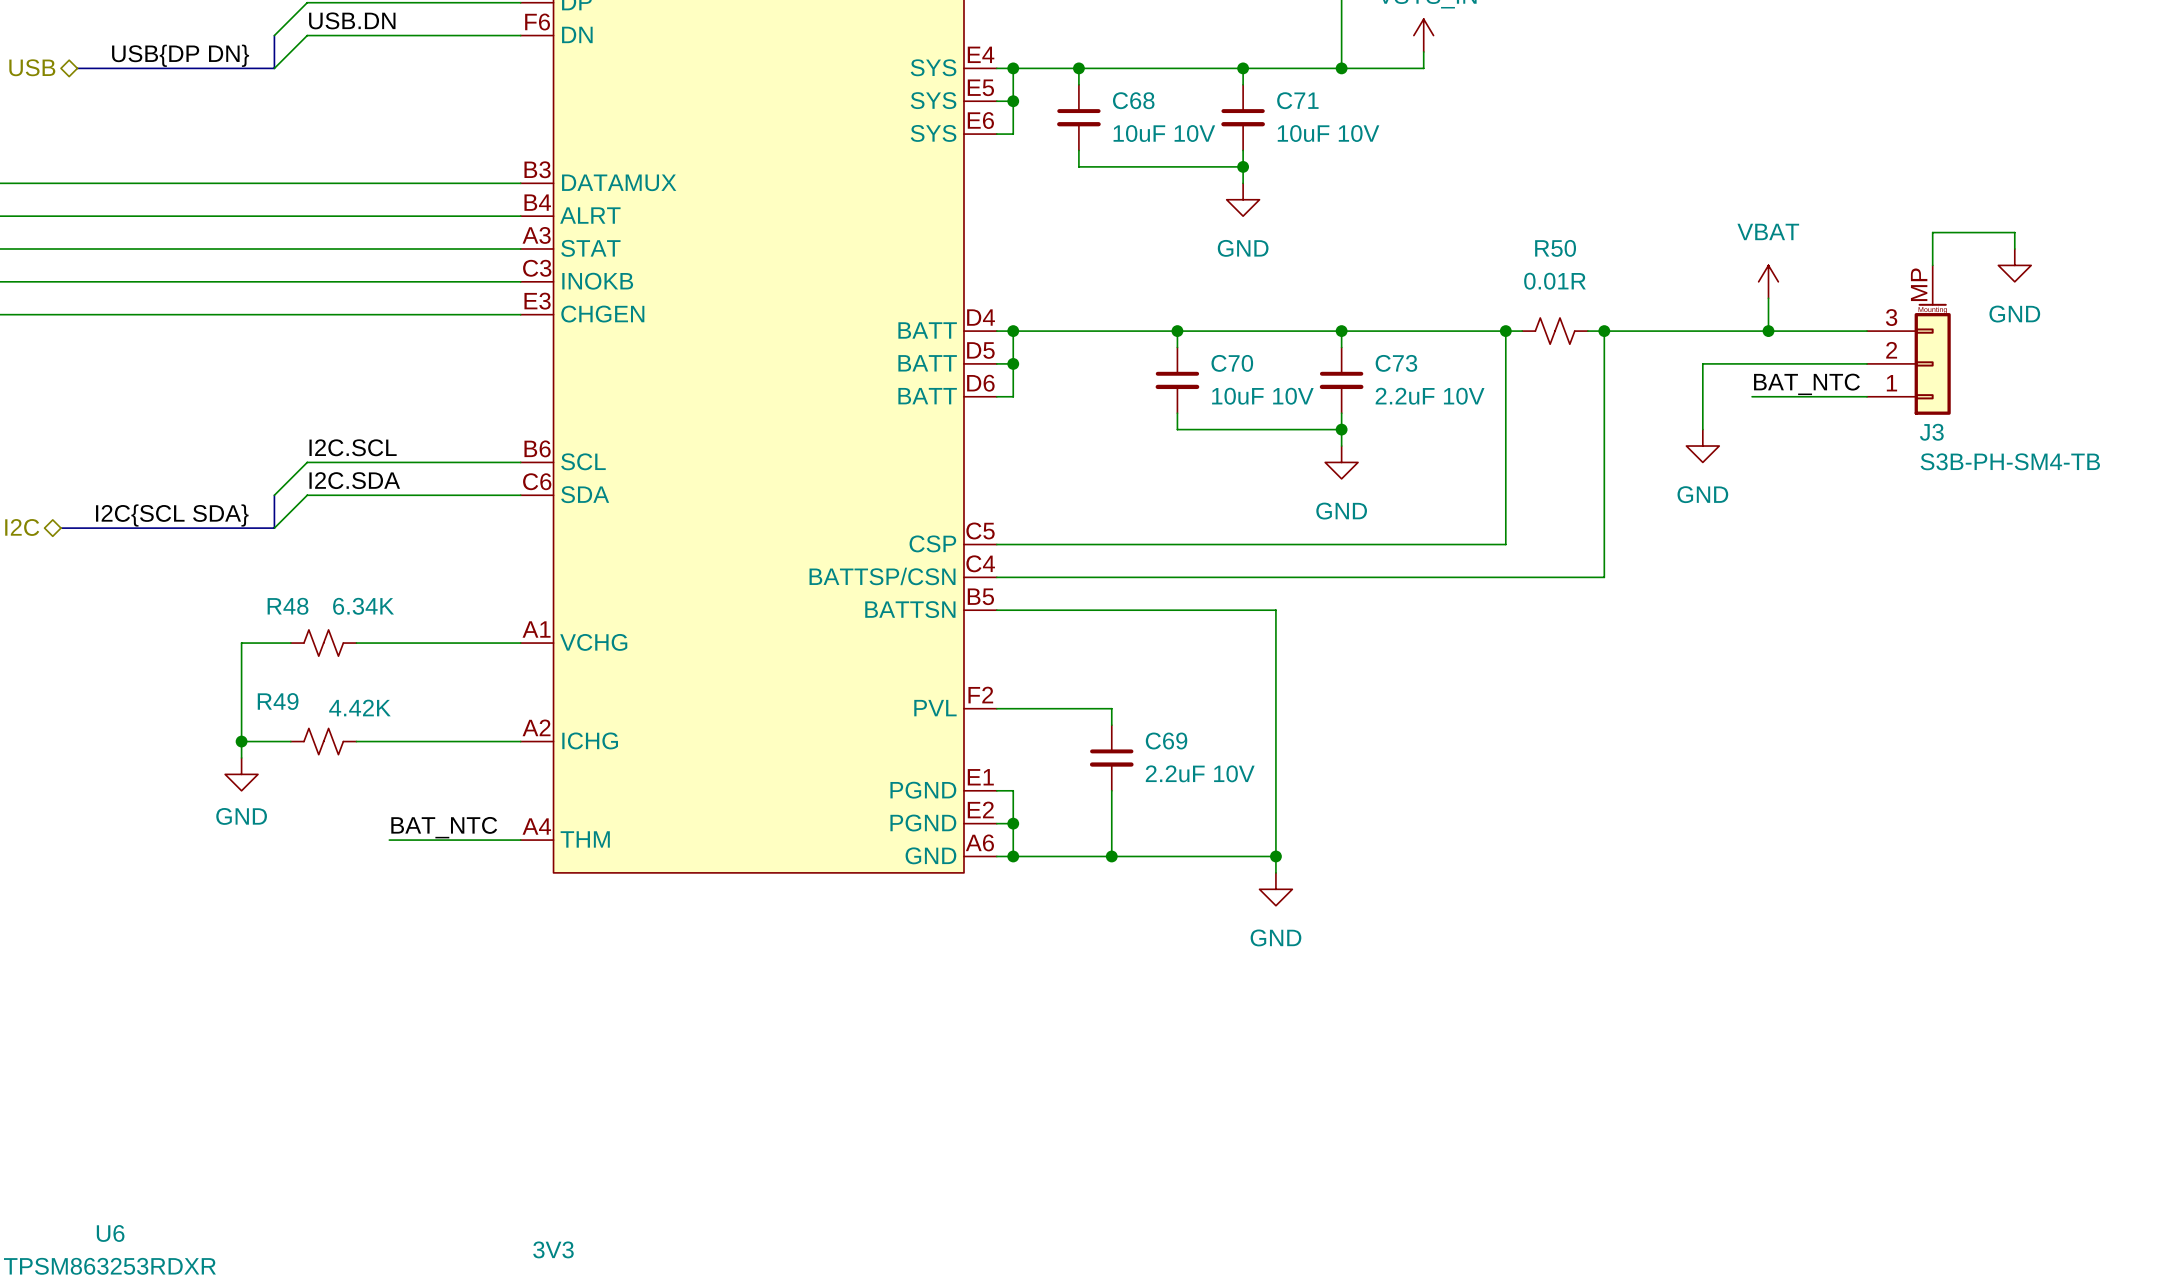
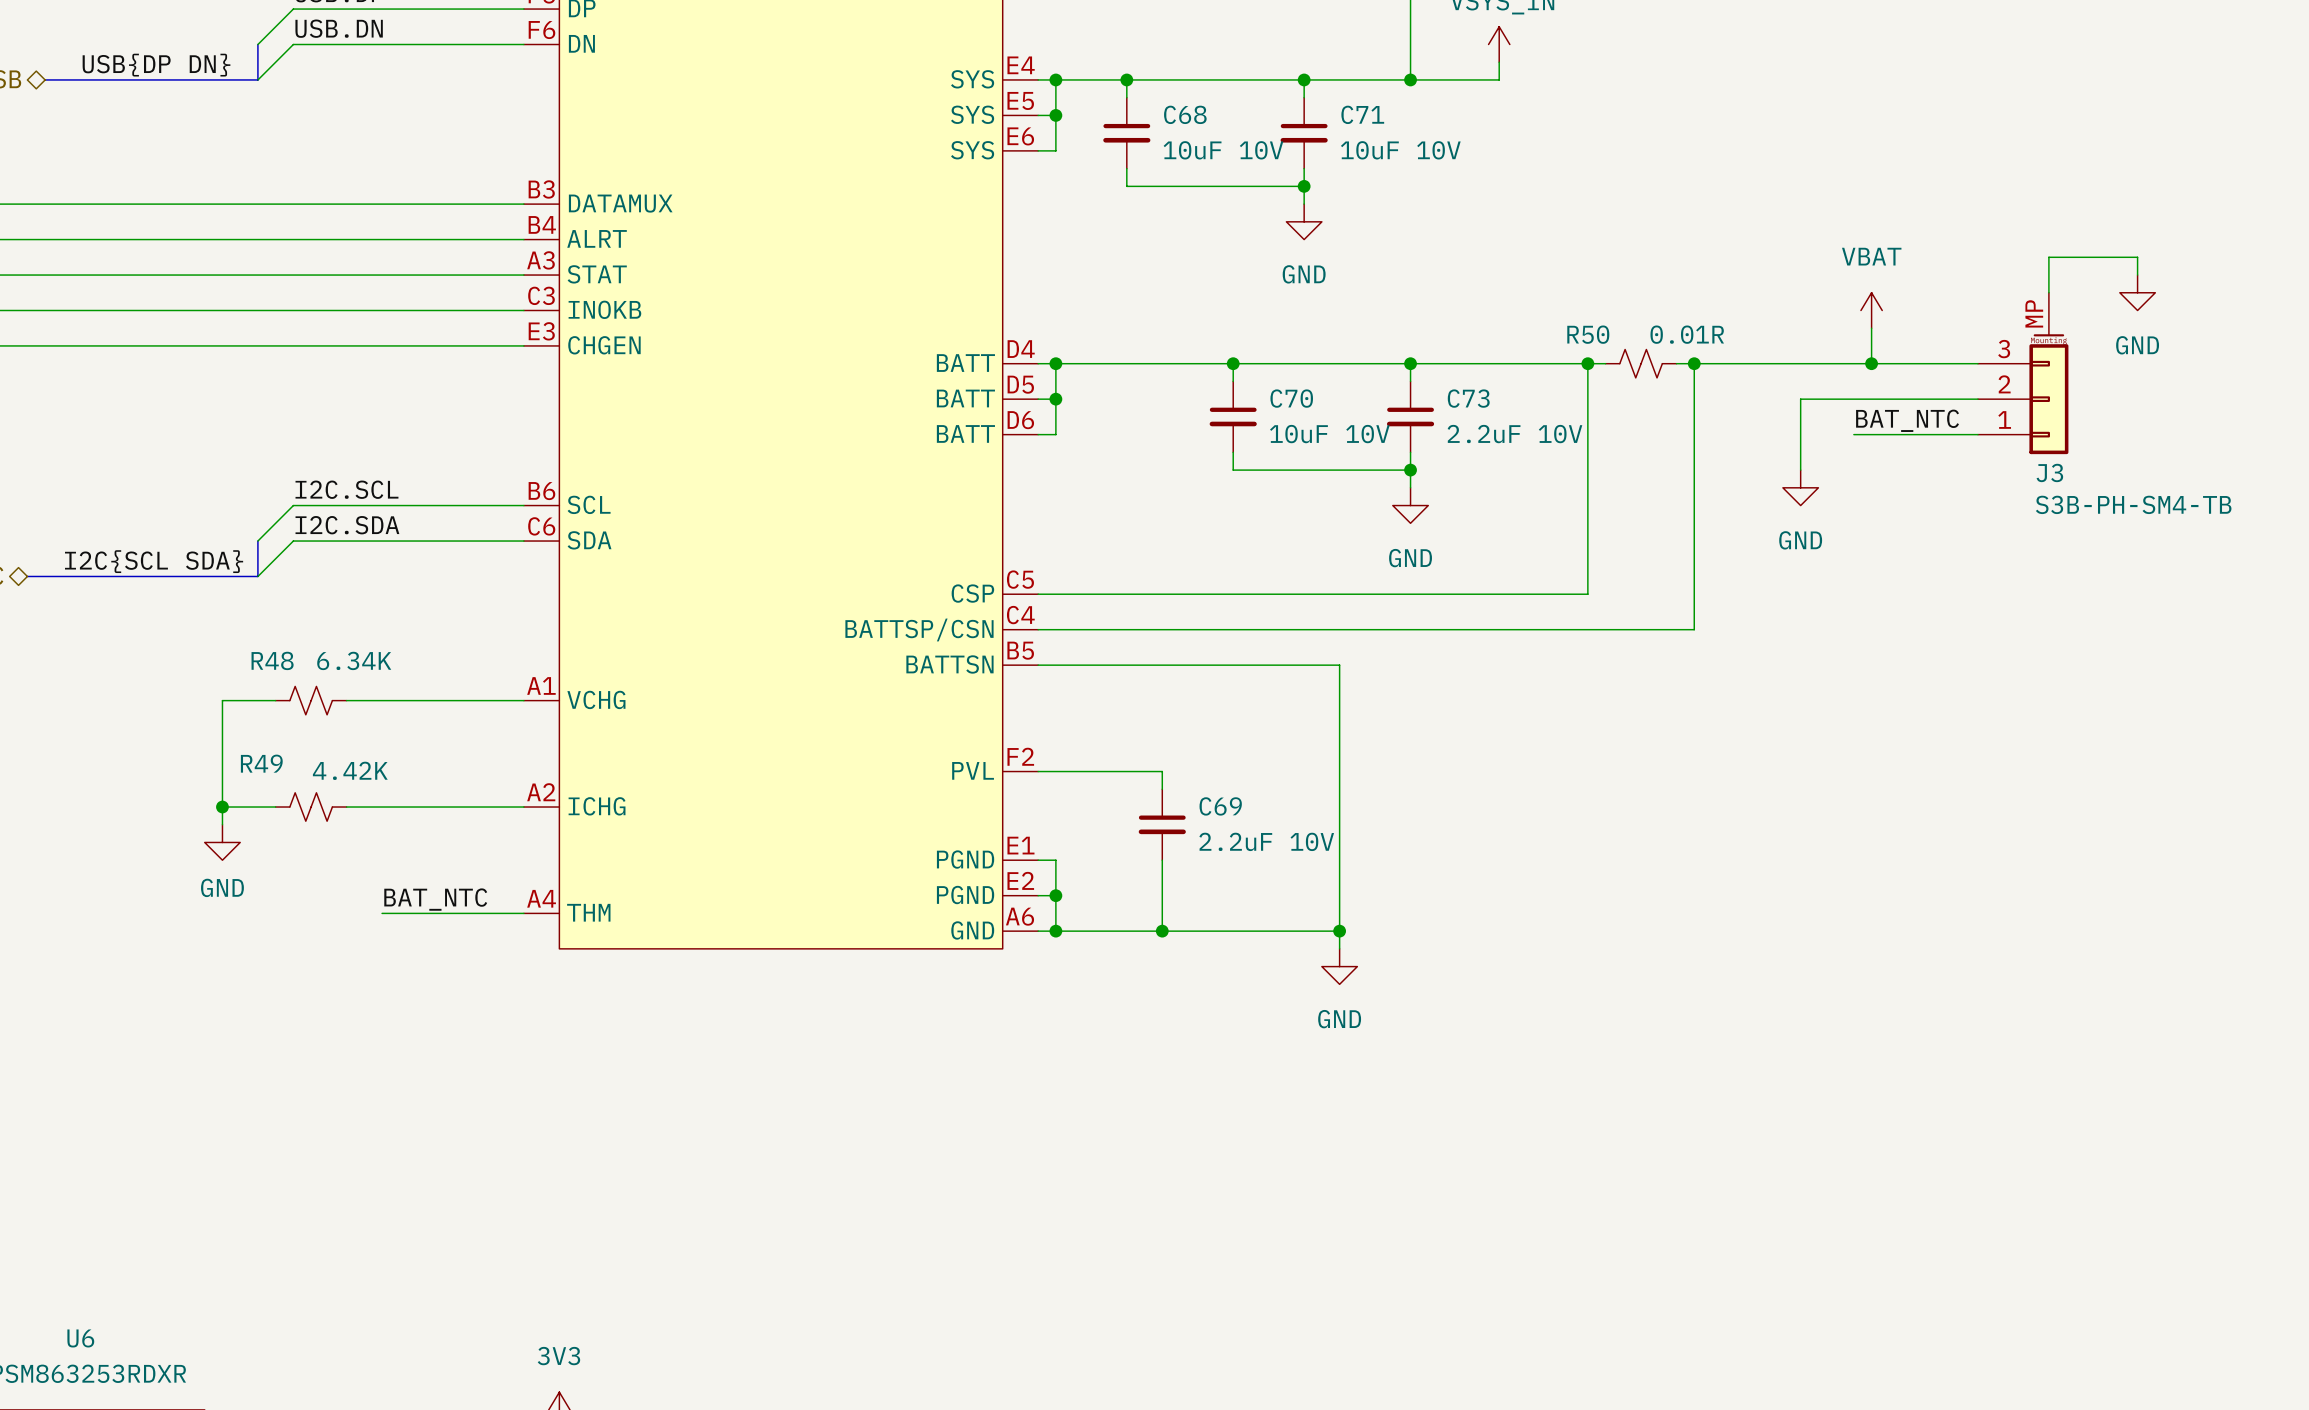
R50 name position: R50 (1555, 248) -> R50 (1588, 334)
R50 value position: 0.01R (1554, 281) -> 0.01R (1687, 334)

